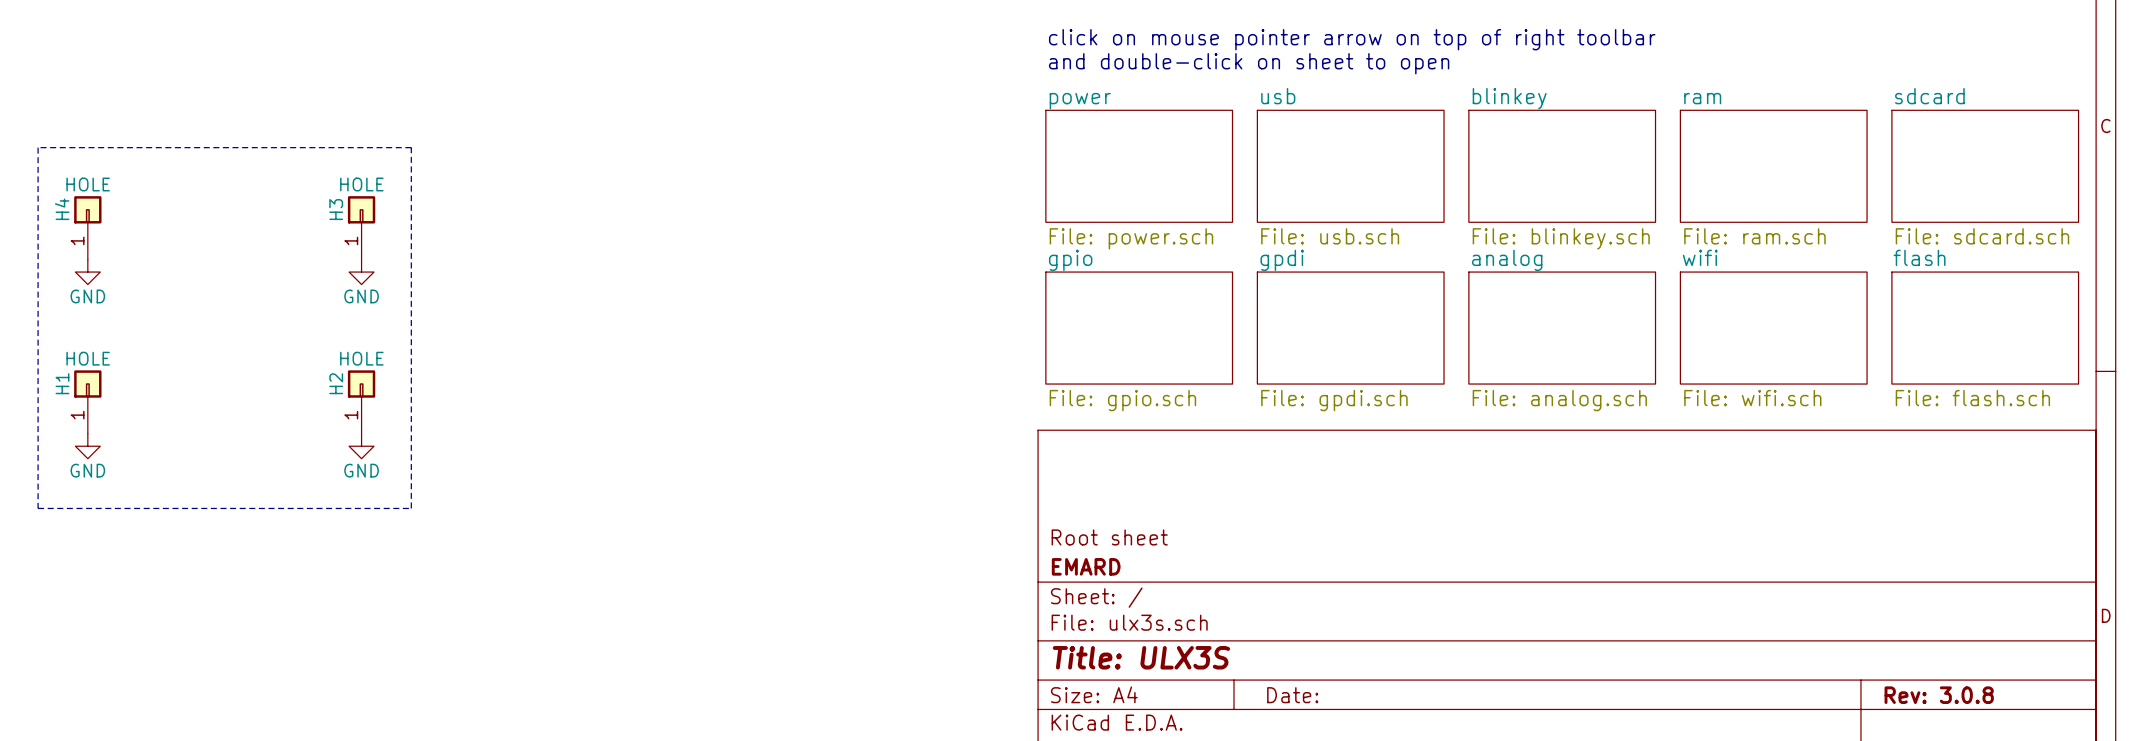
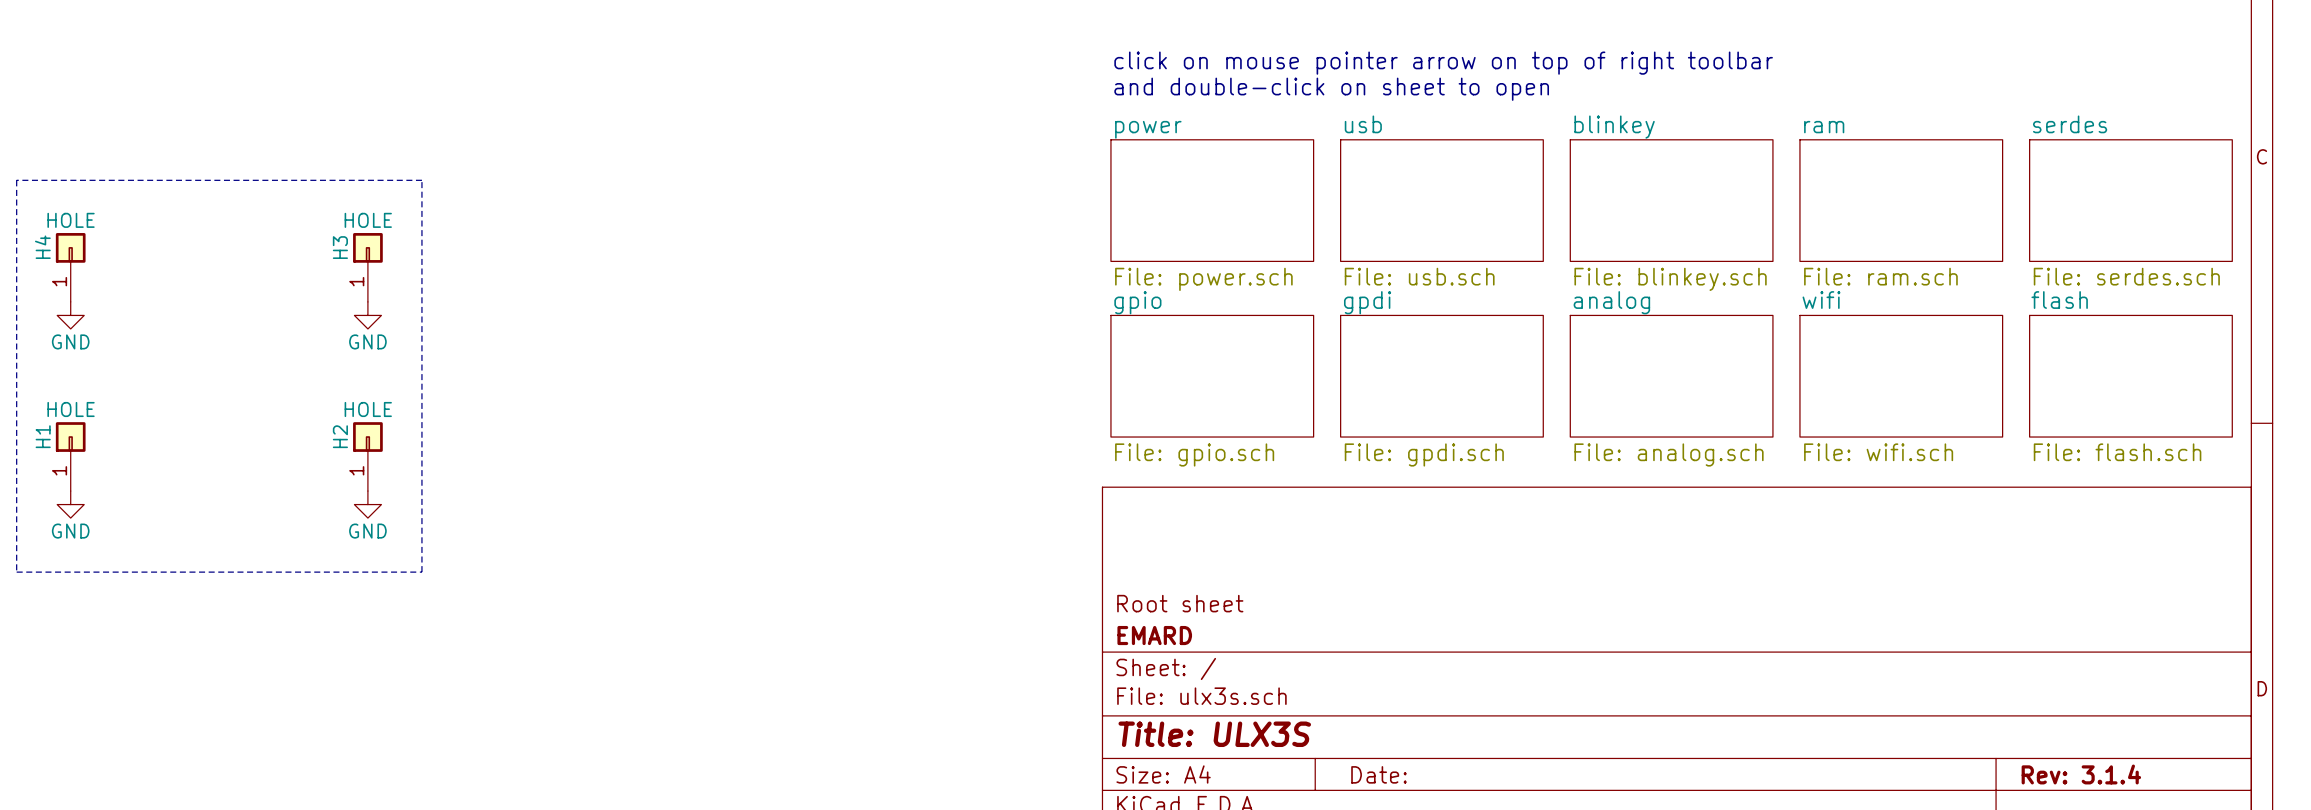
sheet sdcard name: sdcard (1929, 96) -> serdes (2070, 124)
sheet sdcard value: File: sdcard.sch (1982, 236) -> File: serdes.sch (2126, 276)
title block: Rev: 3.0.8 (1939, 695) -> Rev: 3.1.4 (2081, 774)

